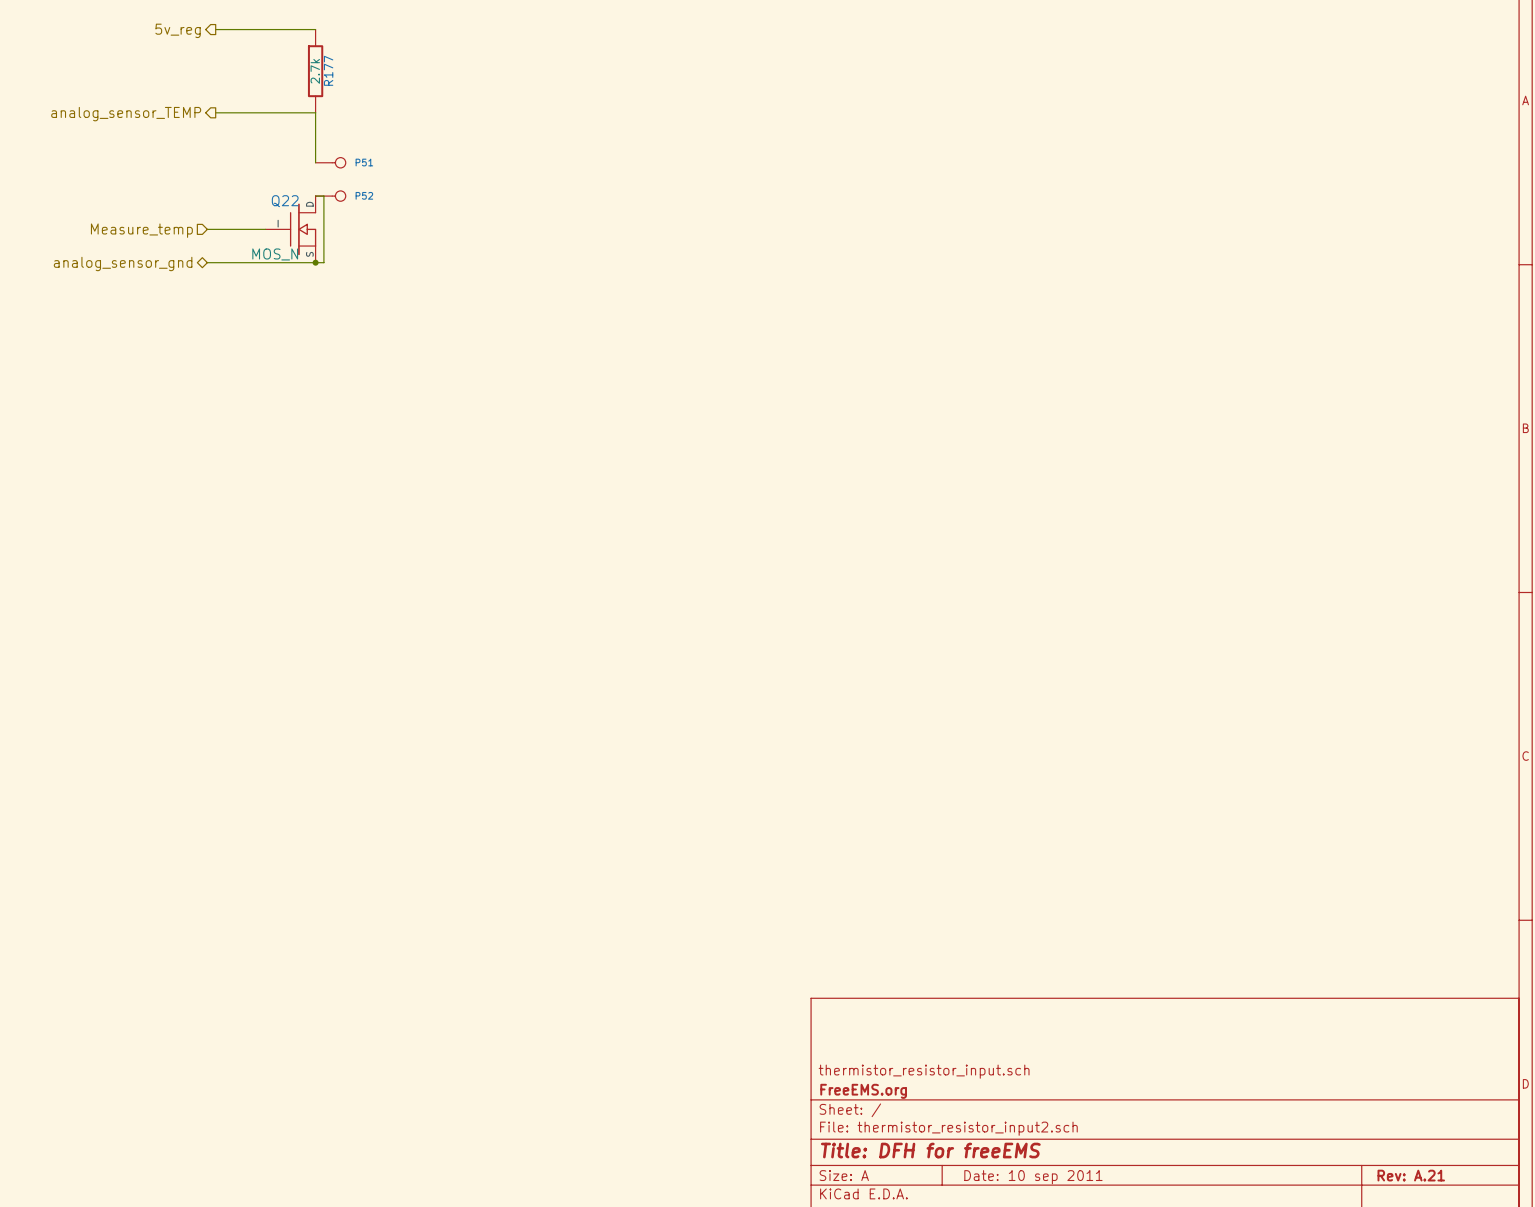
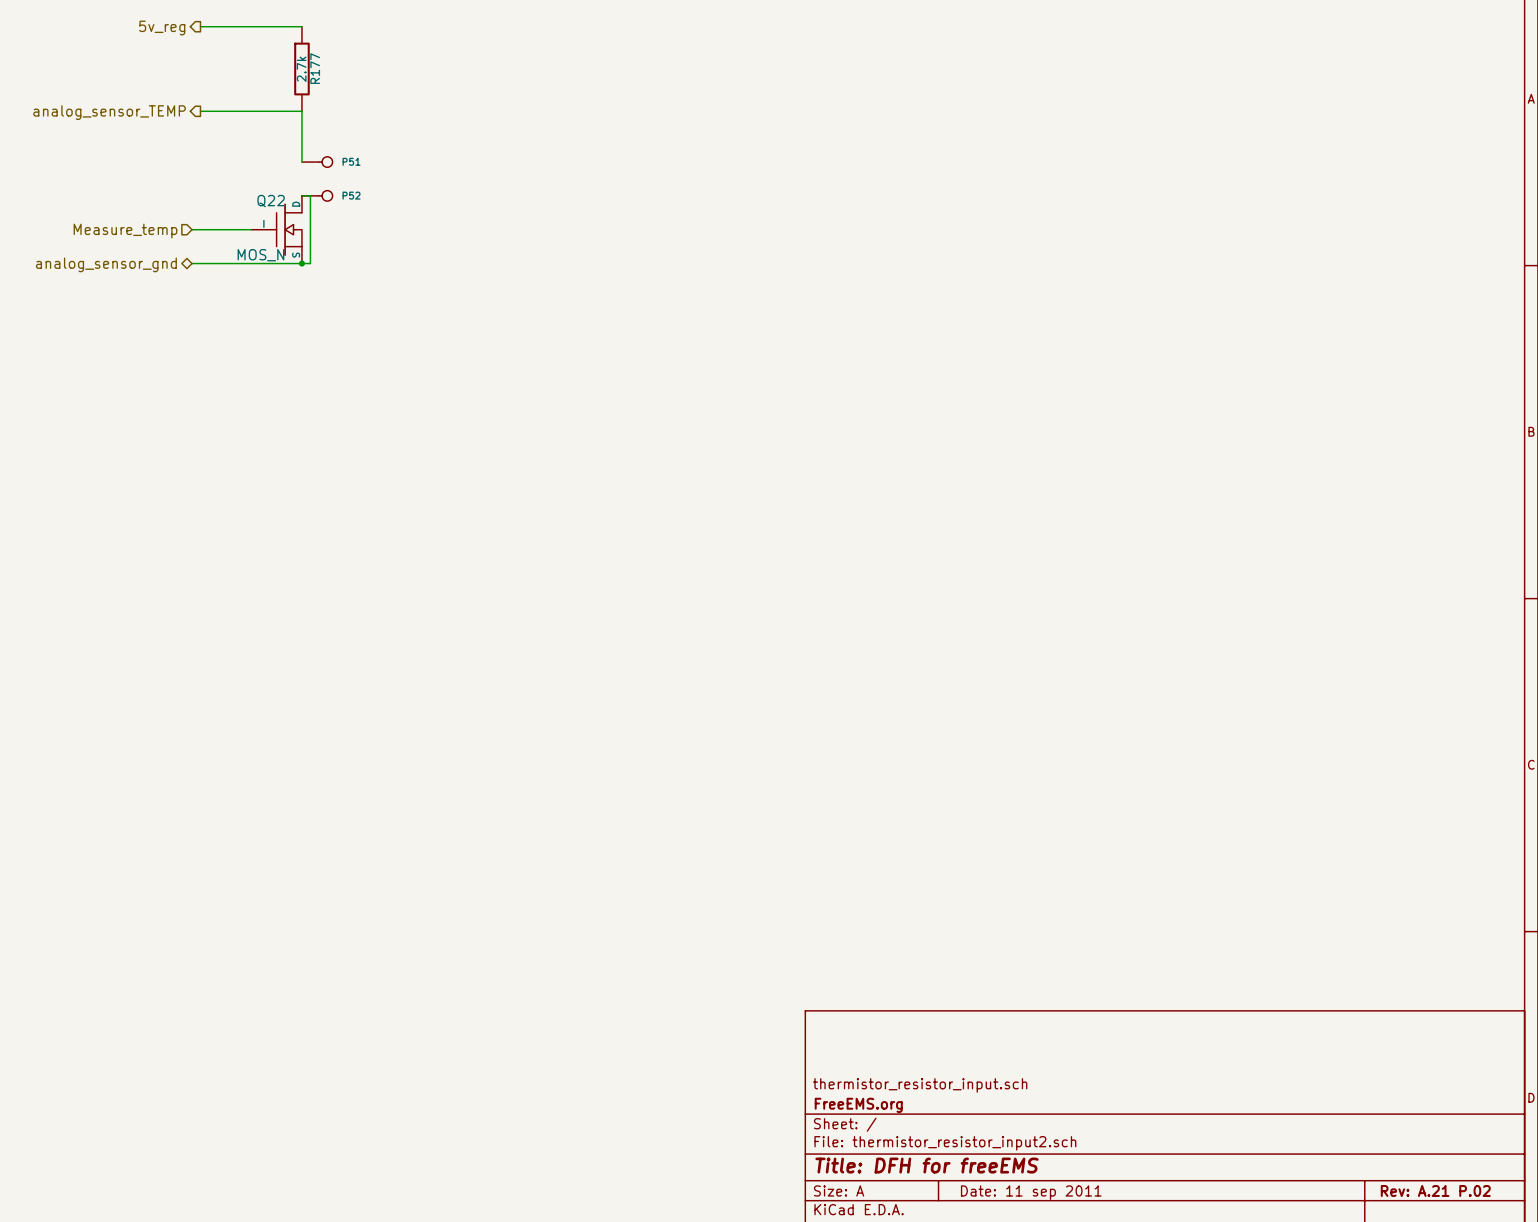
title block: Rev: A.21 (1411, 1175) -> Rev: A.21 P.02 (1435, 1190)
title block: Date: 10 sep 2011 (1033, 1177) -> Date: 11 sep 2011 (1031, 1192)

